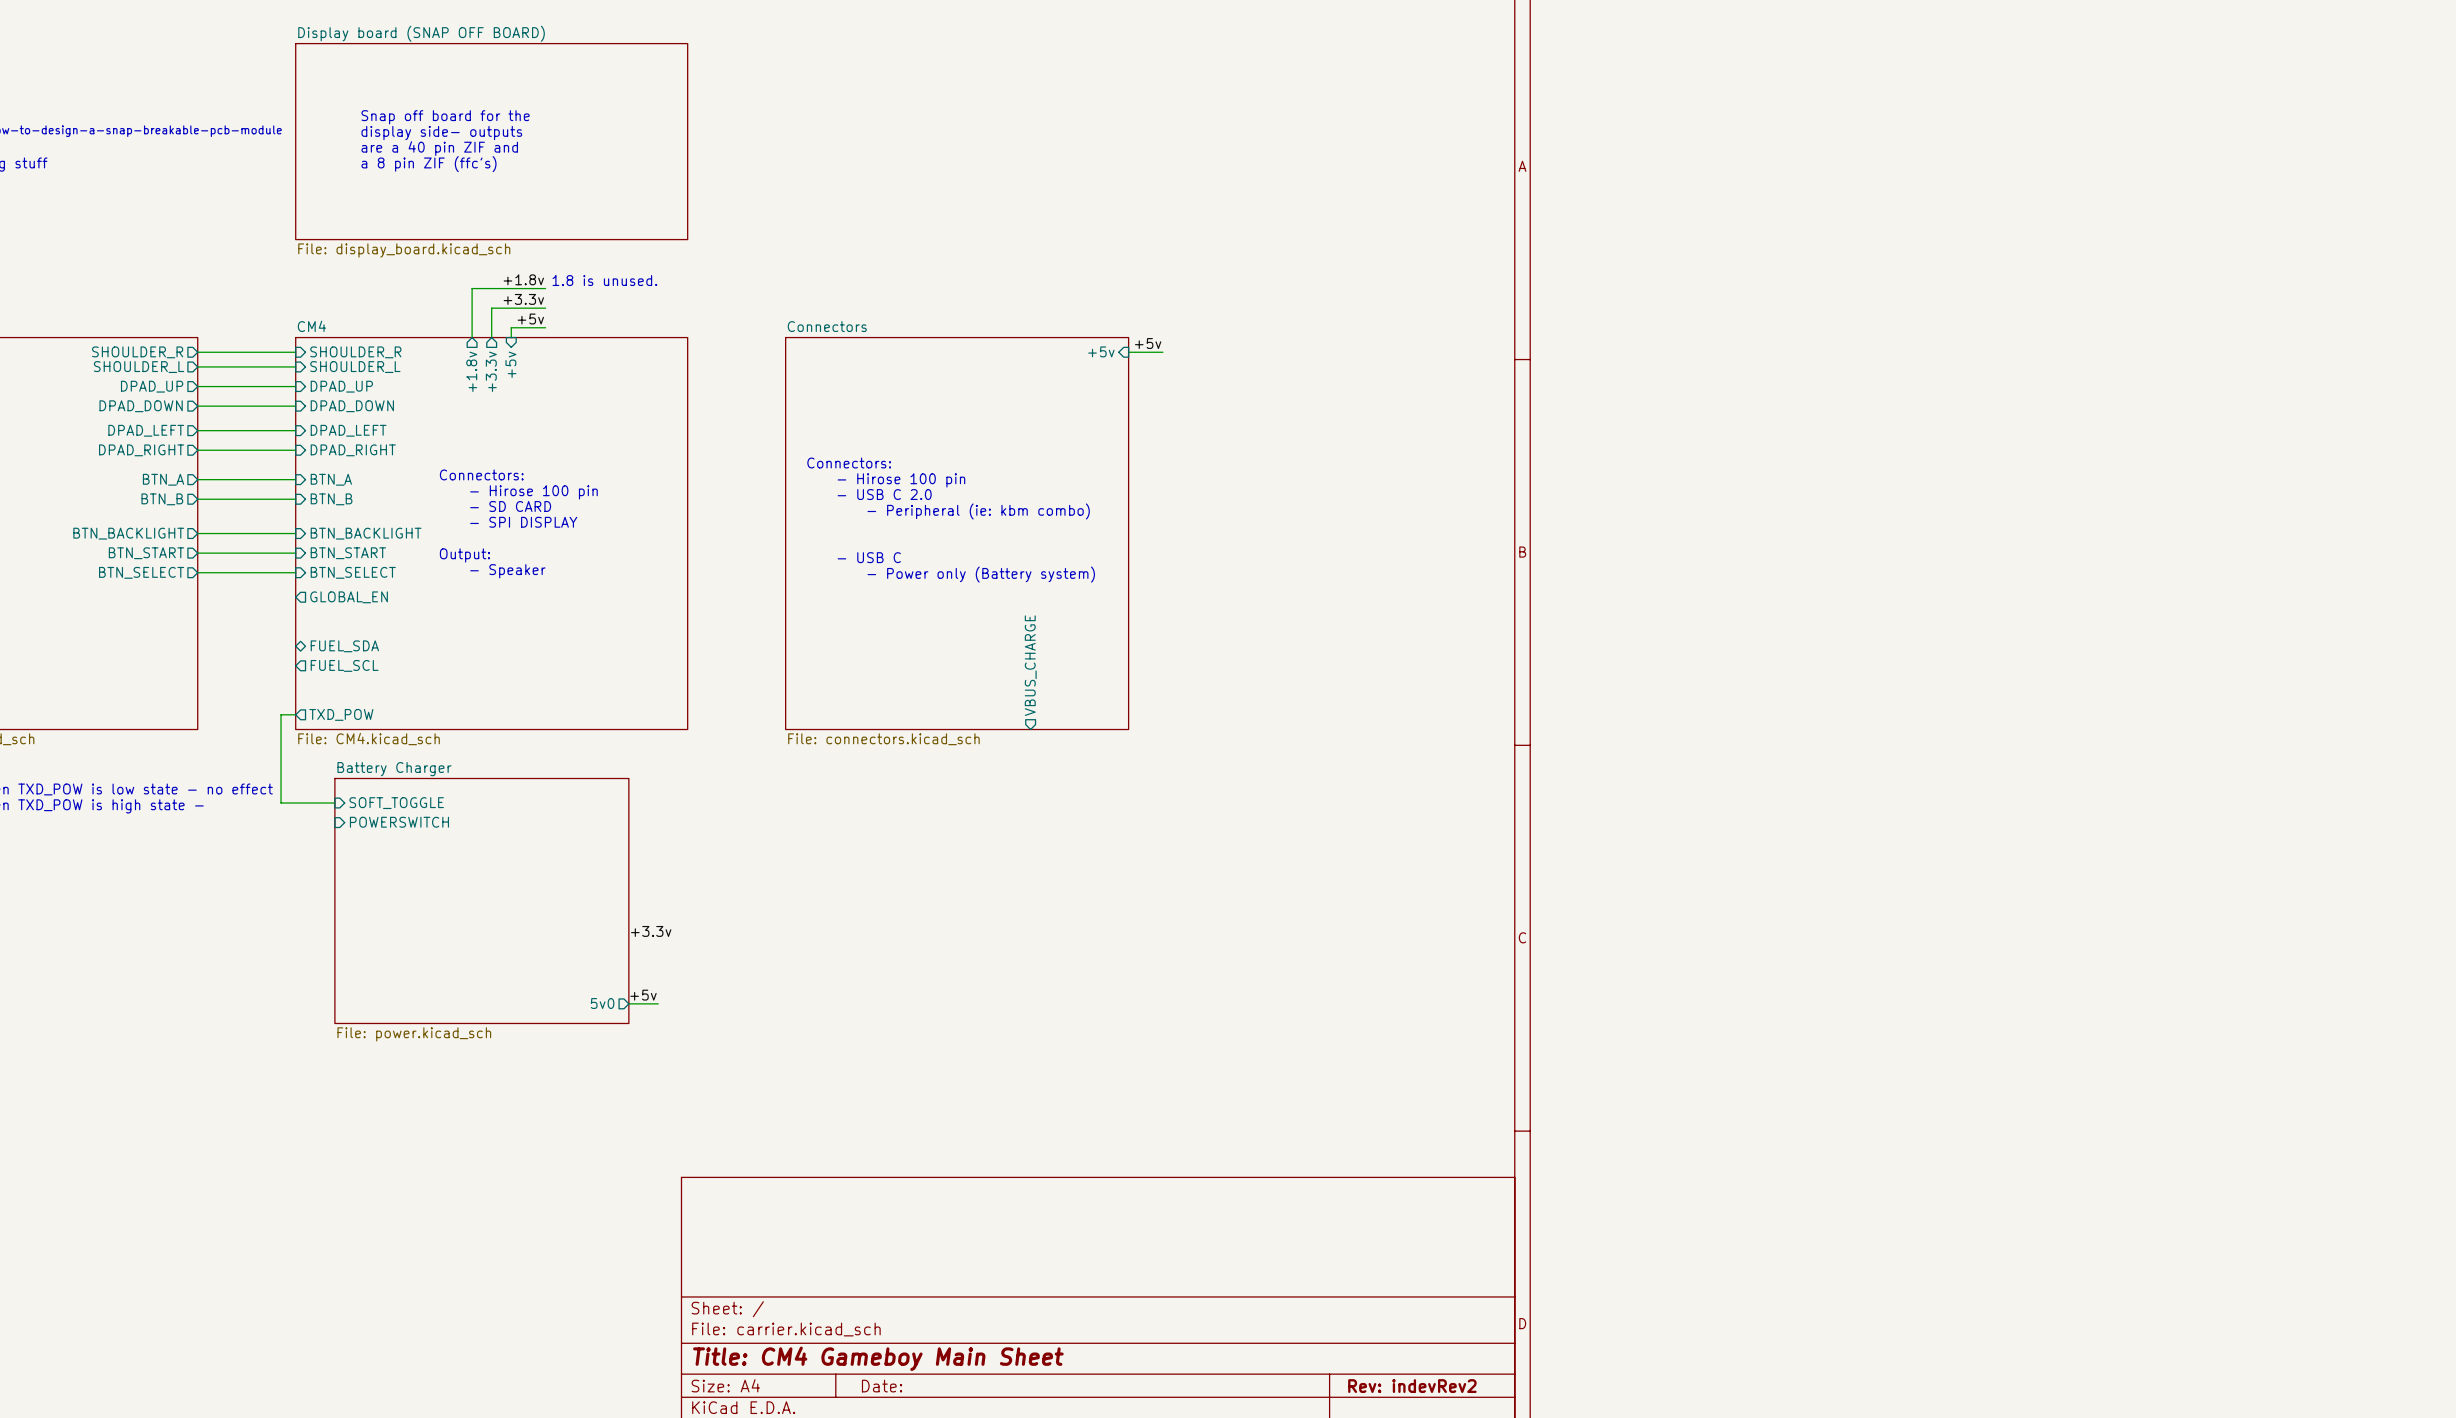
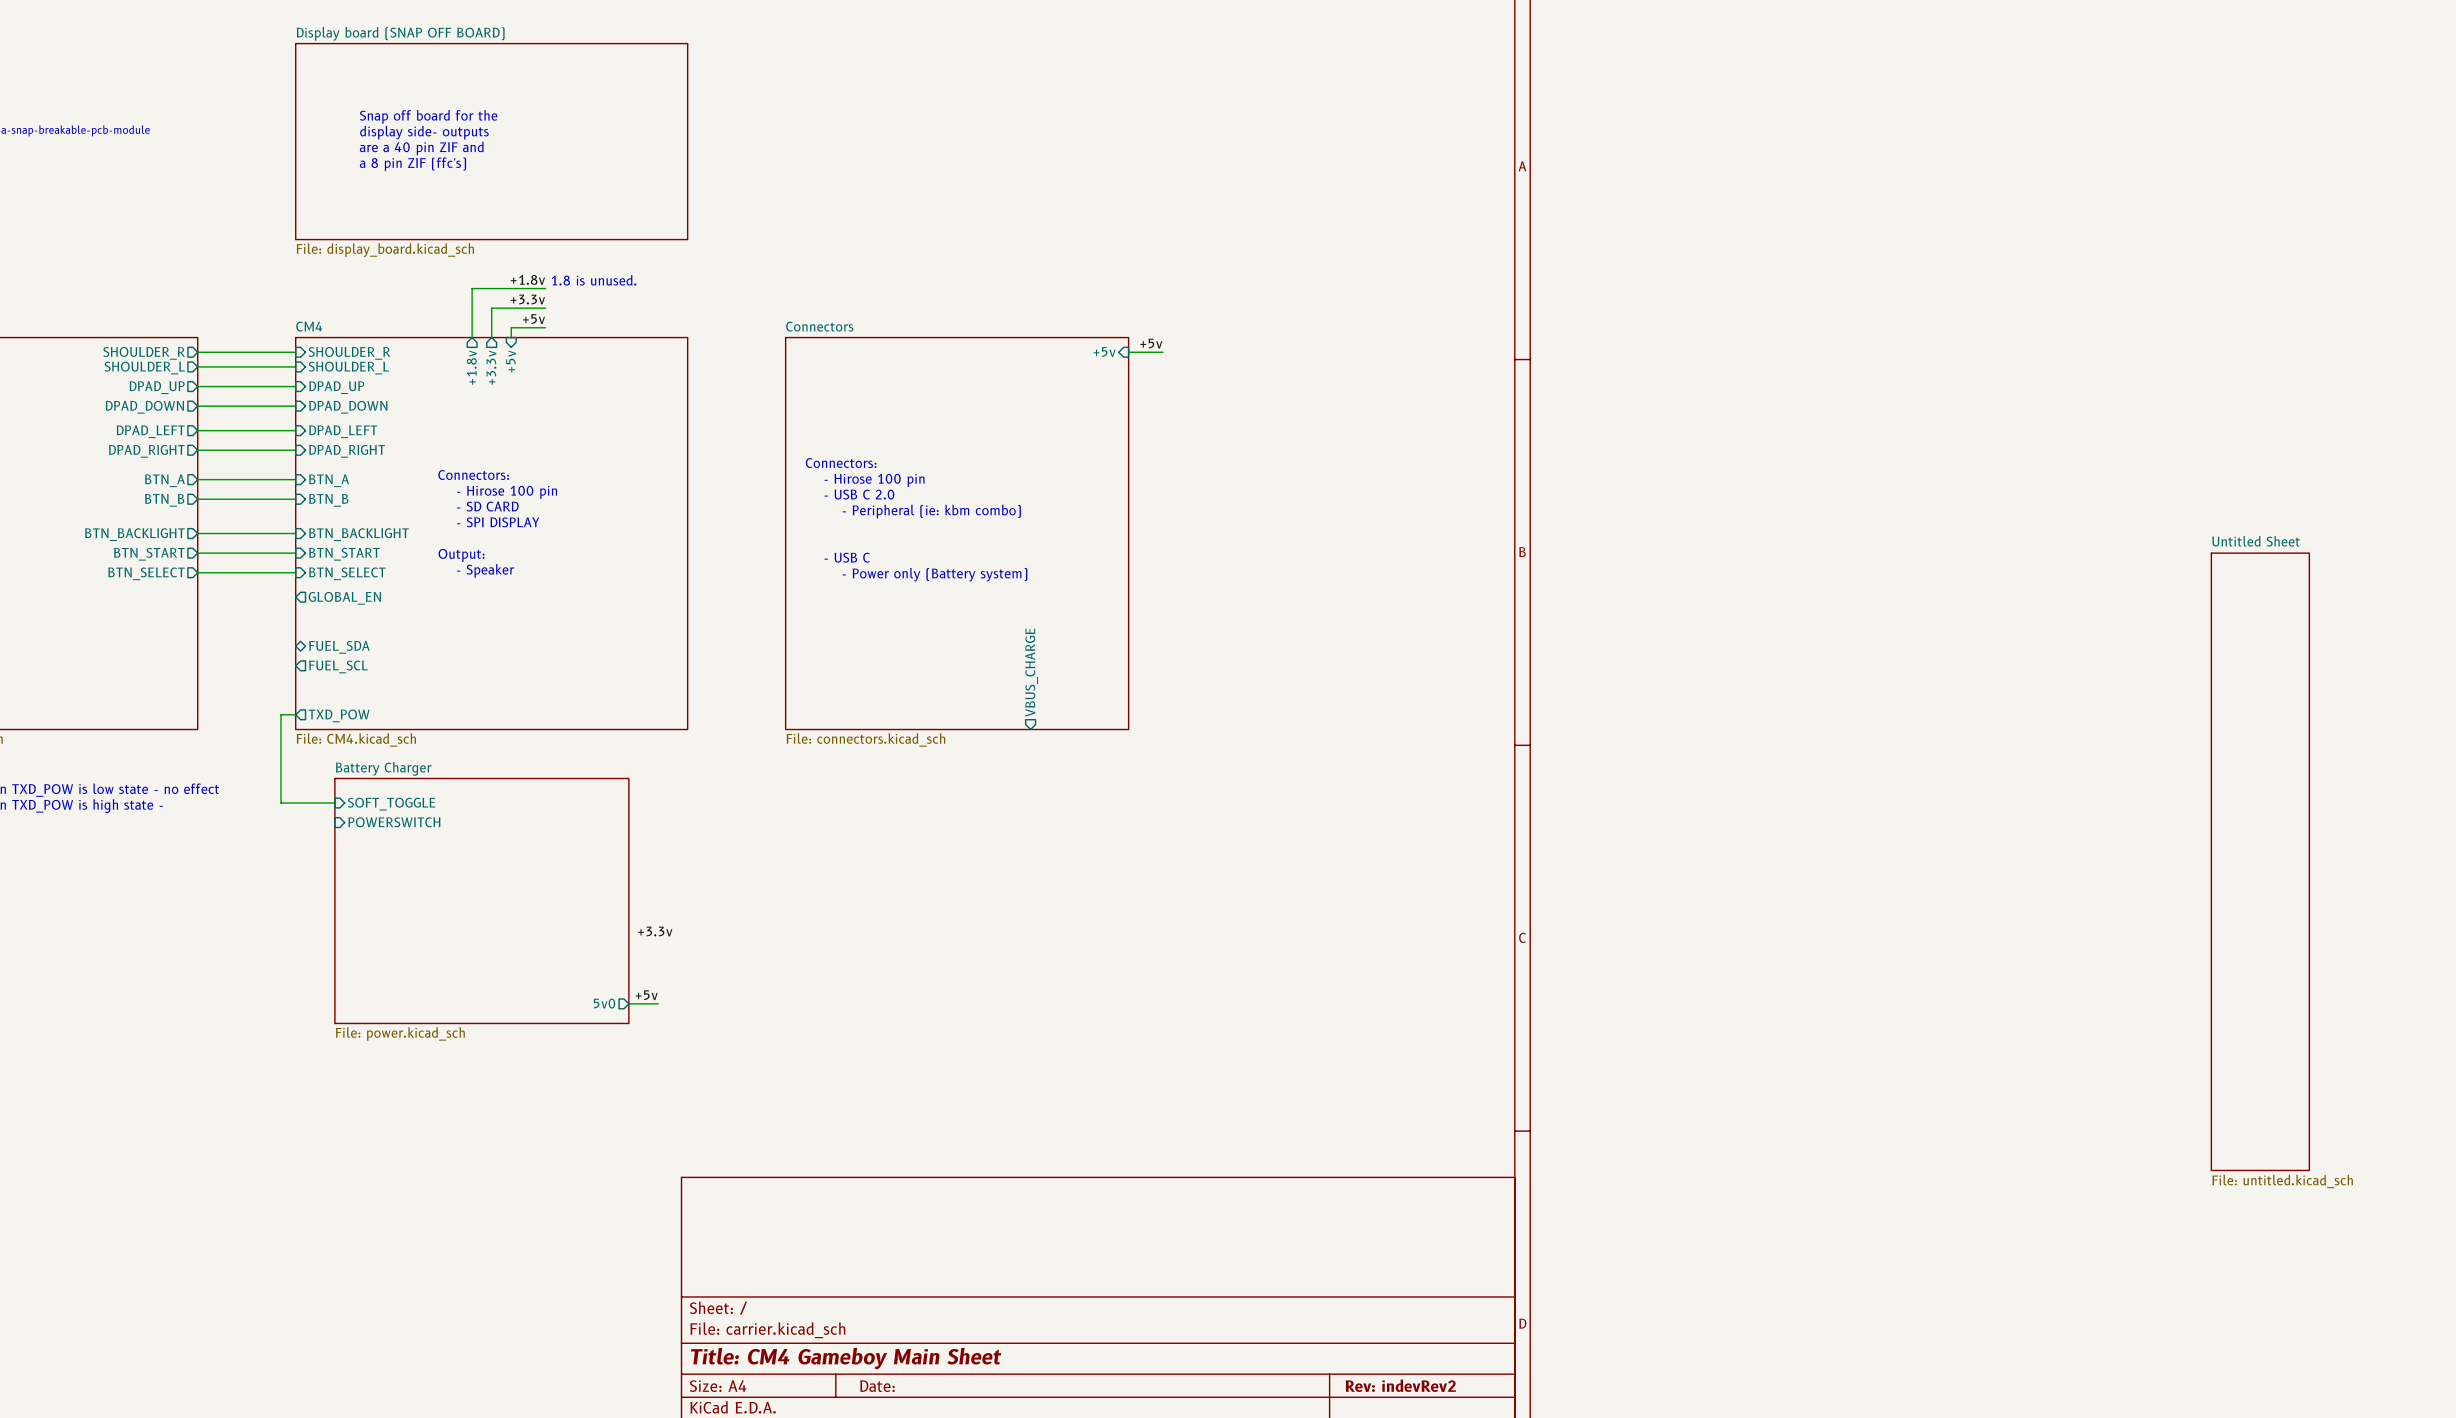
sheet Untitled Sheet: none -> File: untitled.kicad_sch (2260, 861)

